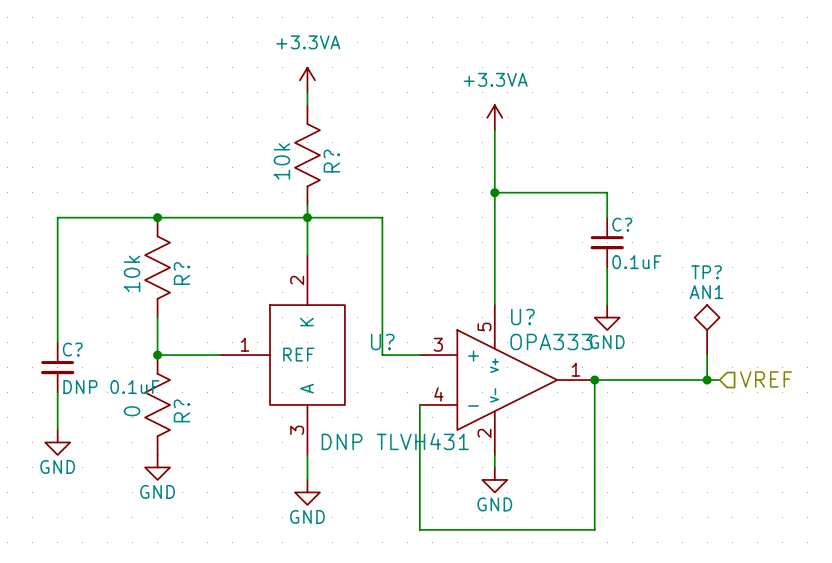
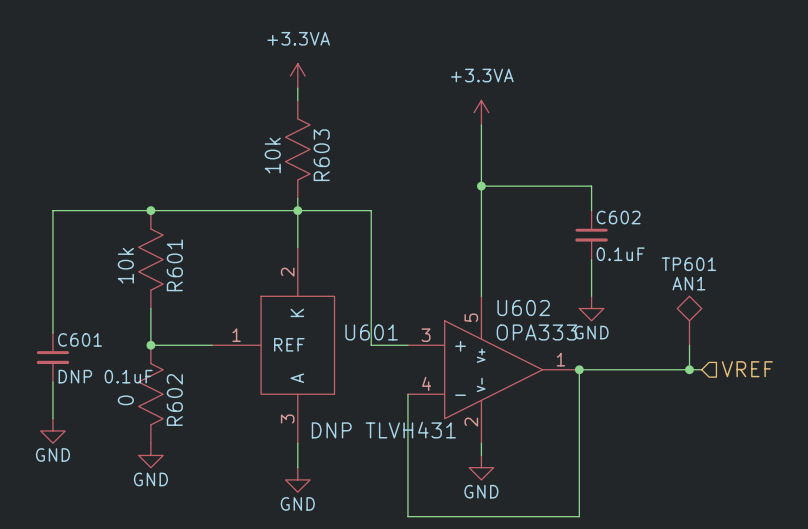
R? name: R? (331, 161) -> R603 (321, 155)
C? name: C? (622, 224) -> C602 (618, 217)
TP? name: TP? (706, 272) -> TP601 (688, 264)
R? name: R? (182, 273) -> R601 (174, 265)
U? name: U? (522, 317) -> U602 (523, 308)
U? name: U? (382, 342) -> U601 (371, 332)
C? name: C? (72, 349) -> C601 (79, 339)
R? name: R? (182, 410) -> R602 (174, 400)

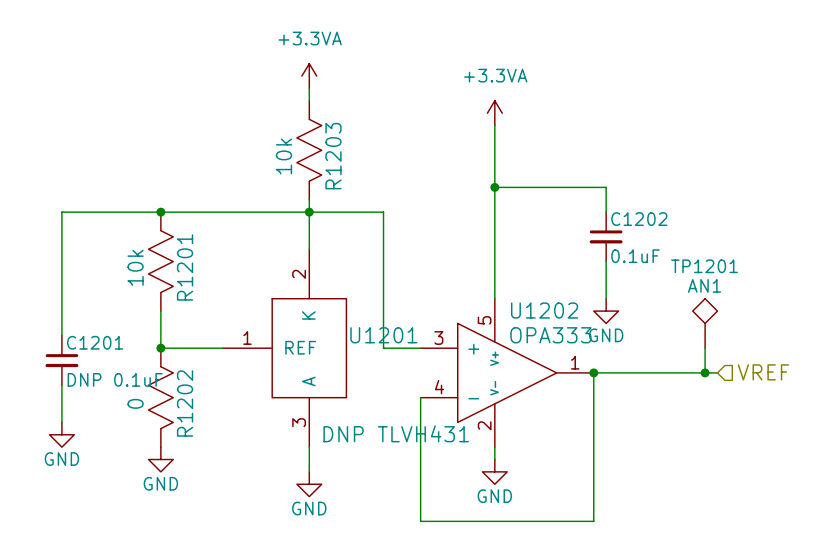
R603 name: R603 (321, 155) -> R1203 (333, 156)
C602 name: C602 (618, 217) -> C1202 (639, 219)
TP601 name: TP601 (688, 264) -> TP1201 (704, 266)
R601 name: R601 (174, 265) -> R1201 (185, 267)
U602 name: U602 (523, 308) -> U1202 (544, 310)
U601 name: U601 (371, 332) -> U1201 (383, 335)
C601 name: C601 (79, 339) -> C1201 (95, 342)
R602 name: R602 (174, 400) -> R1202 (185, 403)

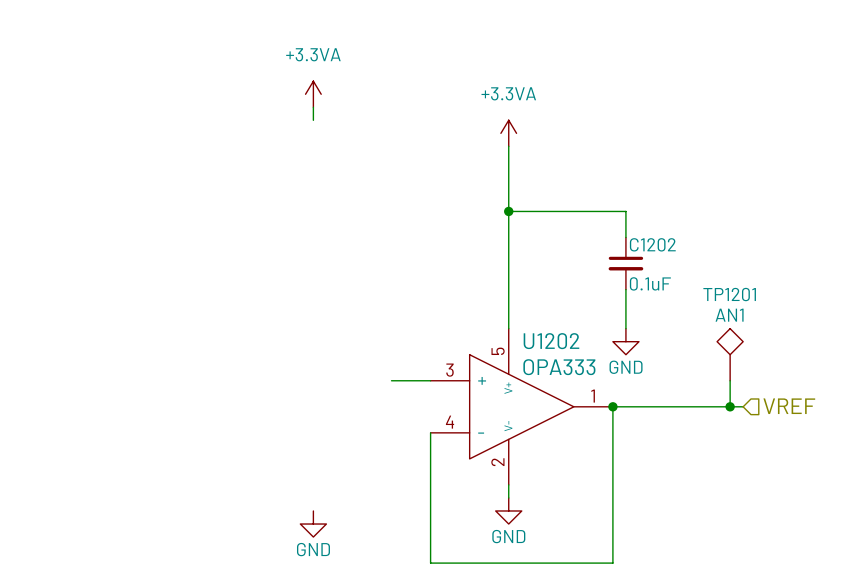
R1203: 10k (309, 150) -> none
wire: (309, 199) (309, 249) -> none
junction: (160, 212) -> none
junction: (309, 212) -> none
R1201: 10k (160, 261) -> none
wire: (160, 311) (160, 348) (222, 348) -> none
wire: (61, 335) (61, 212) (383, 212) (383, 348) -> none
junction: (160, 348) -> none
U1201: DNP TLVH431 (284, 348) -> none
C1201: DNP 0.1uF (61, 360) -> none
wire: (61, 385) (61, 422) -> none
R1202: 0 (160, 397) -> none
power symbol: GND (61, 434) -> none
wire: (309, 447) (309, 471) -> none
power symbol: GND (160, 459) -> none

